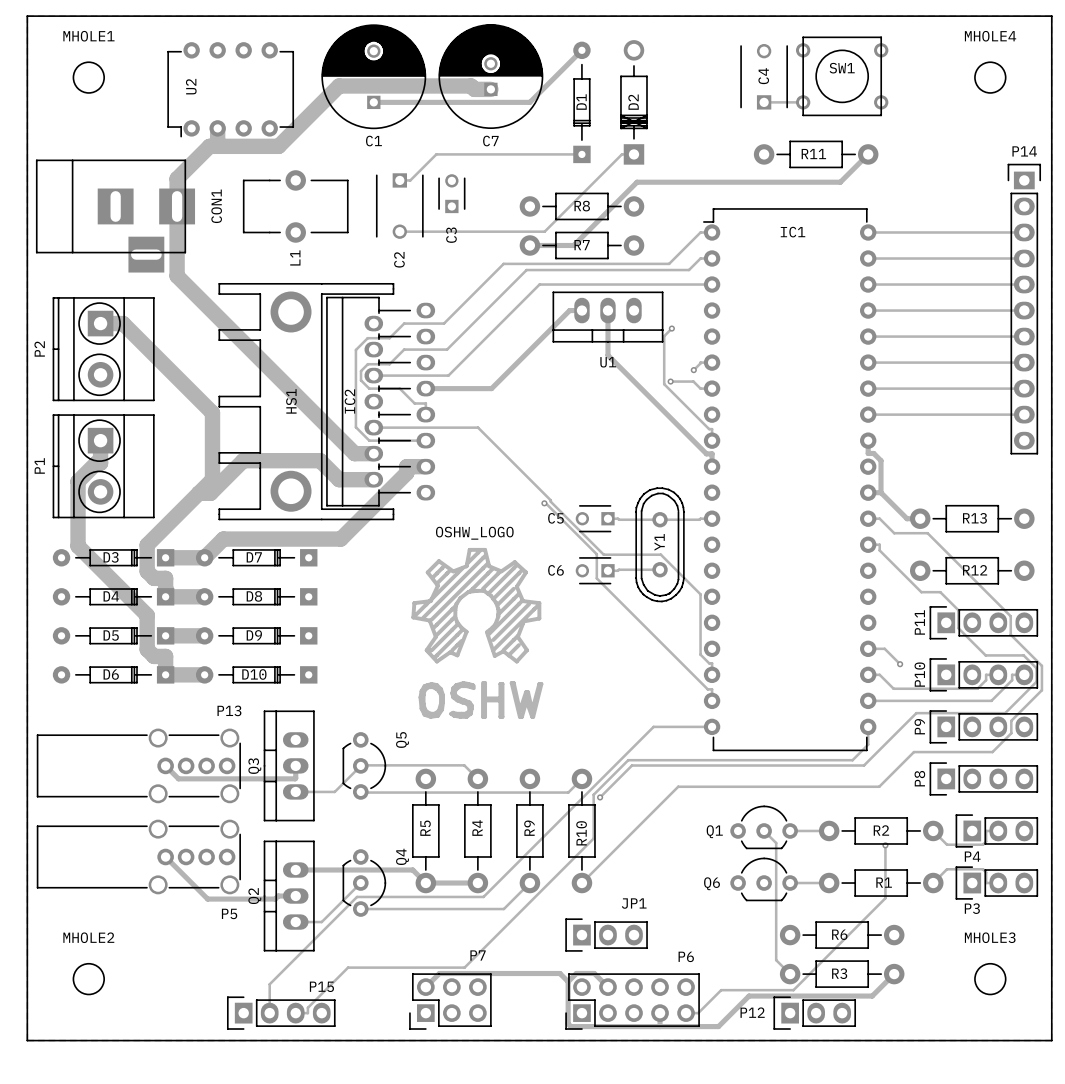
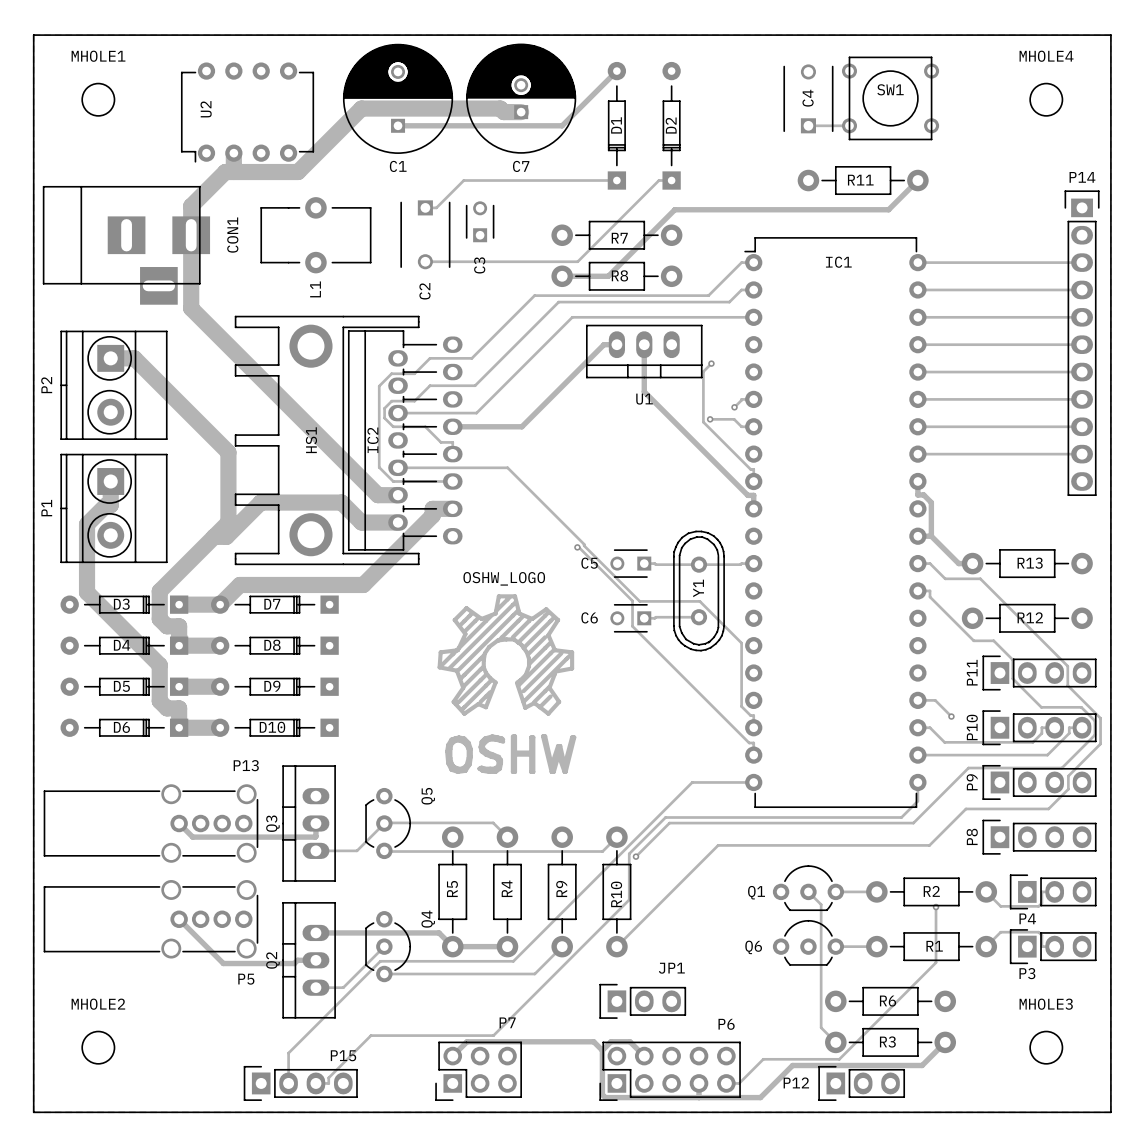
D2 footprint: [620, 40, 648, 165] -> [662, 61, 681, 190]
R8 name position: R8 (582, 206) -> R8 (619, 275)
R7 name position: R7 (582, 245) -> R7 (619, 238)

